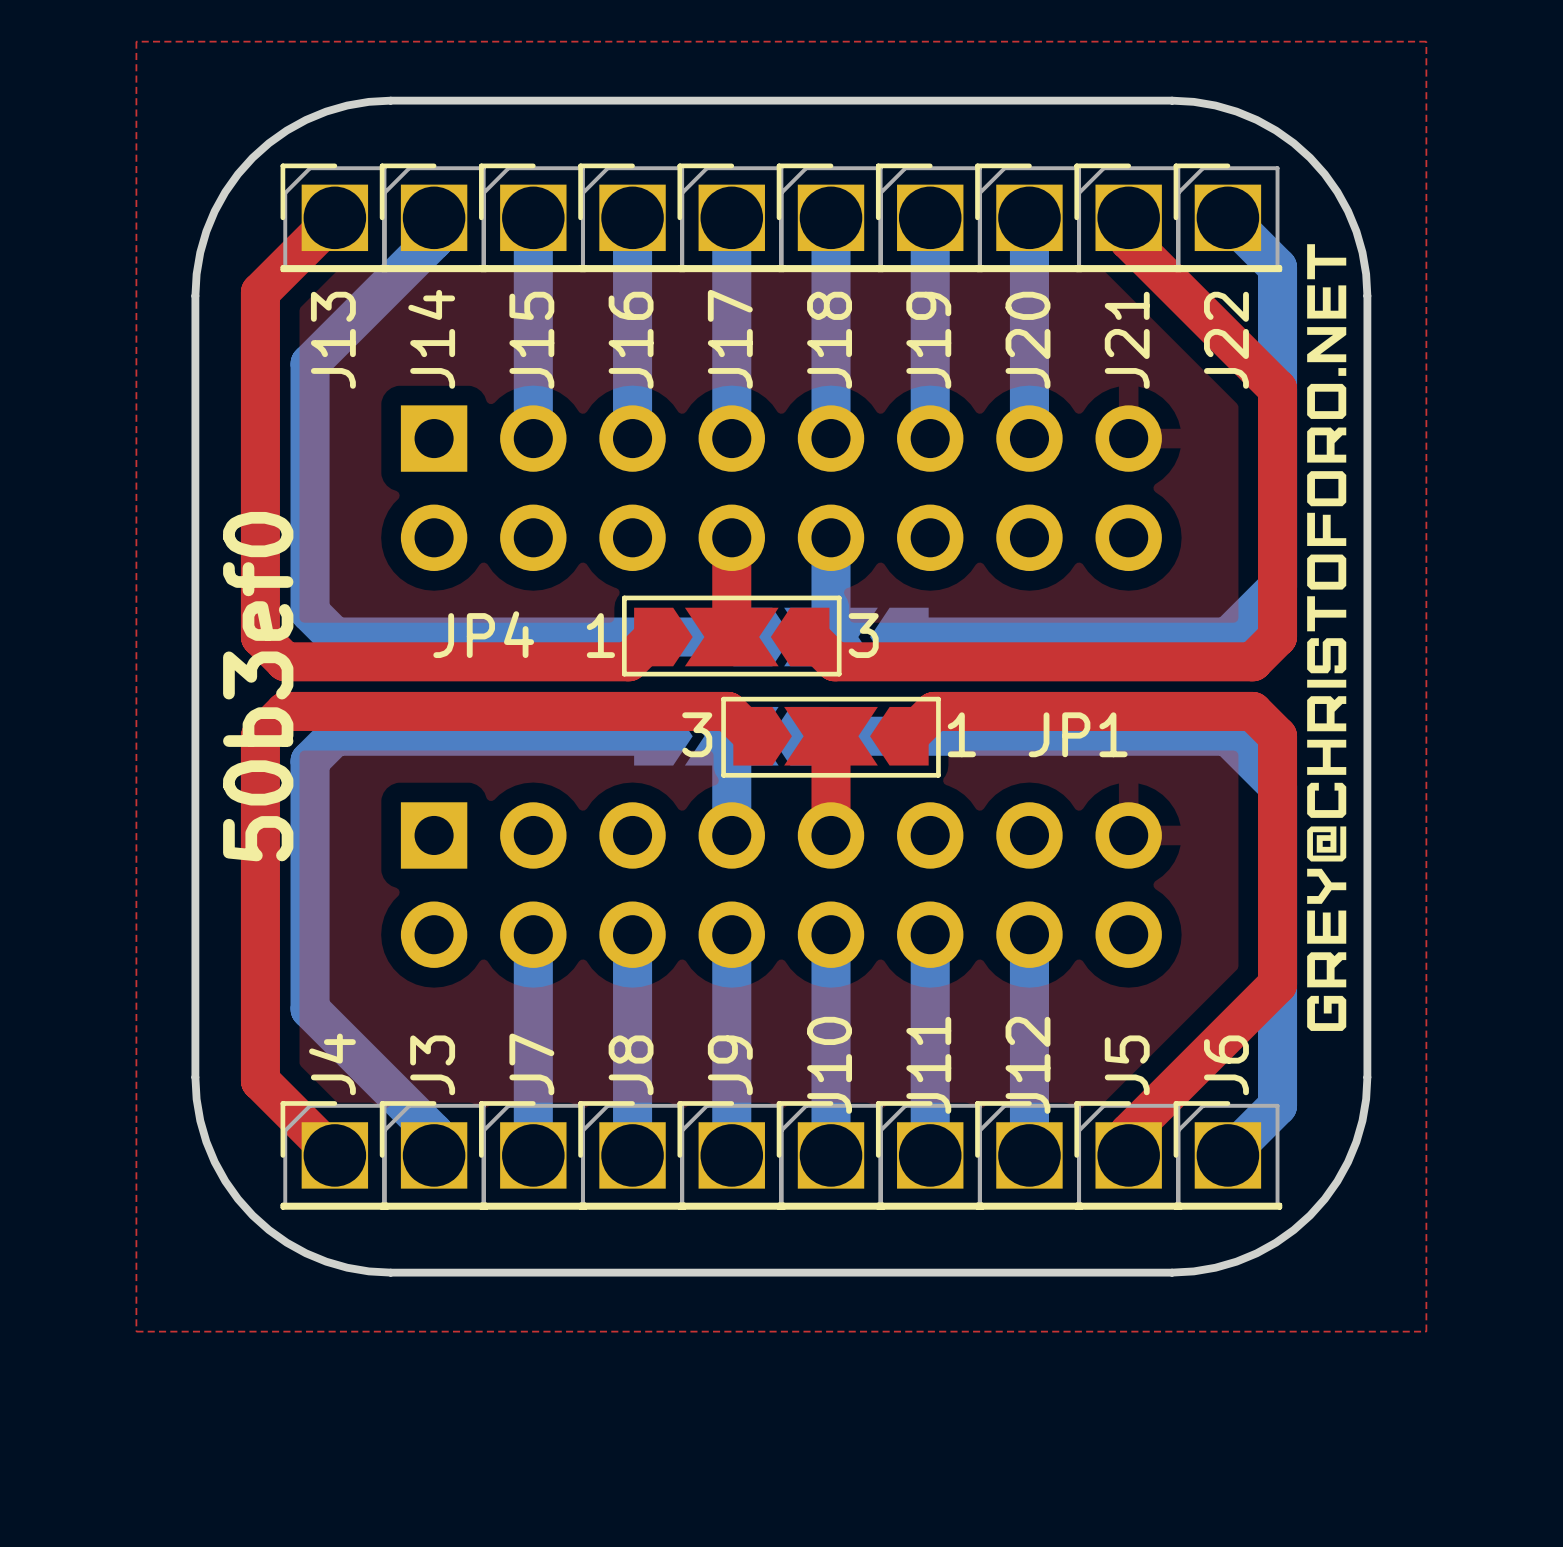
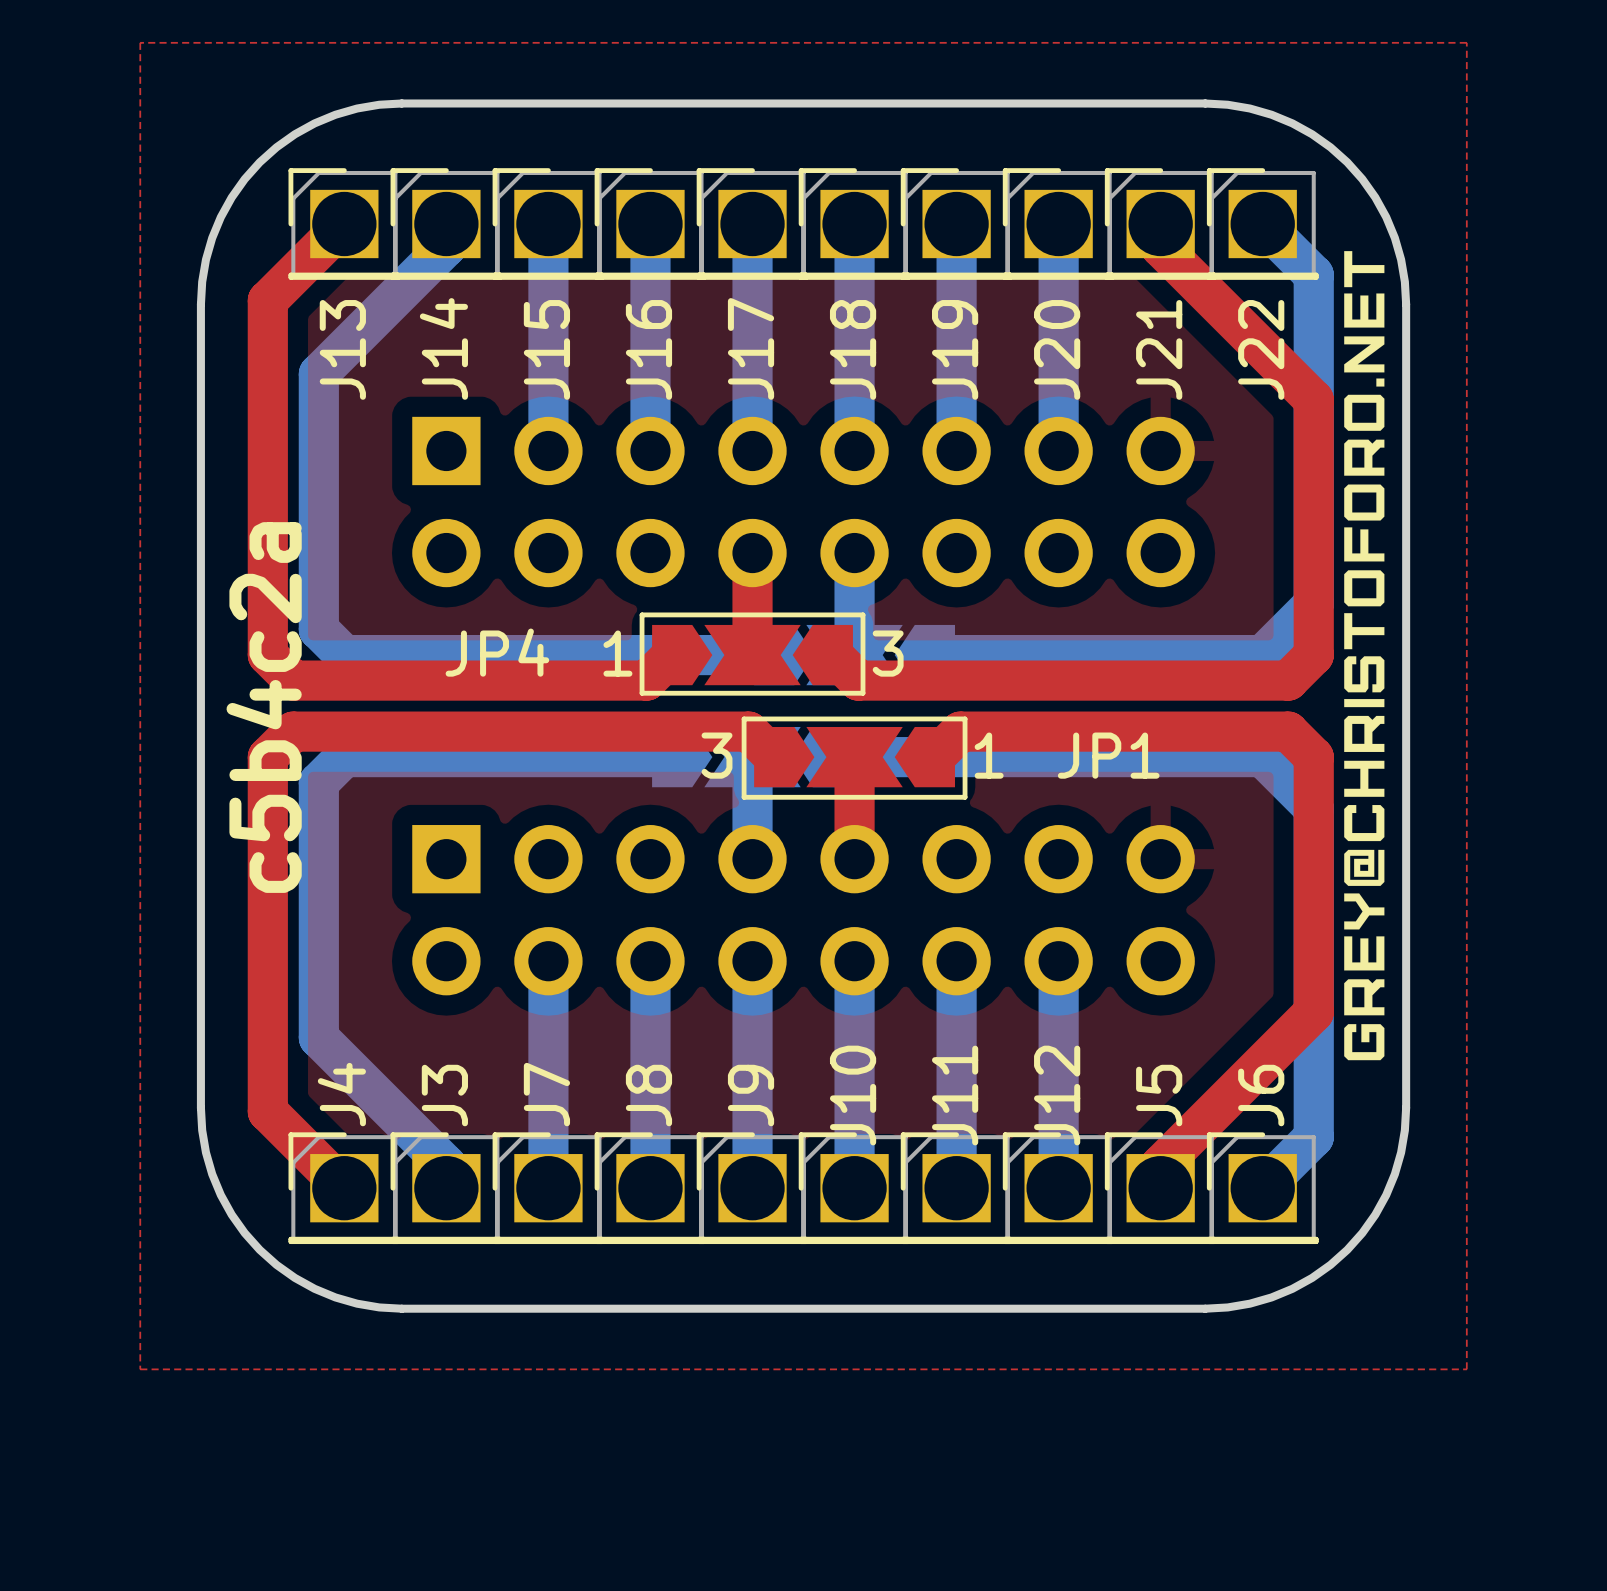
text: 50b3ef0 (258, 686) -> c5b4c2a (264, 707)

